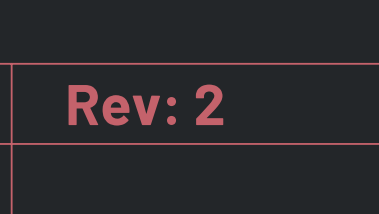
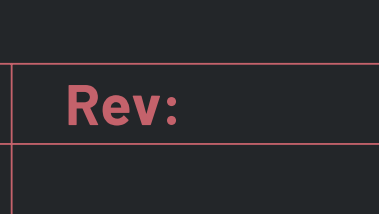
title block: Rev: 2 (145, 105) -> Rev: (122, 105)

